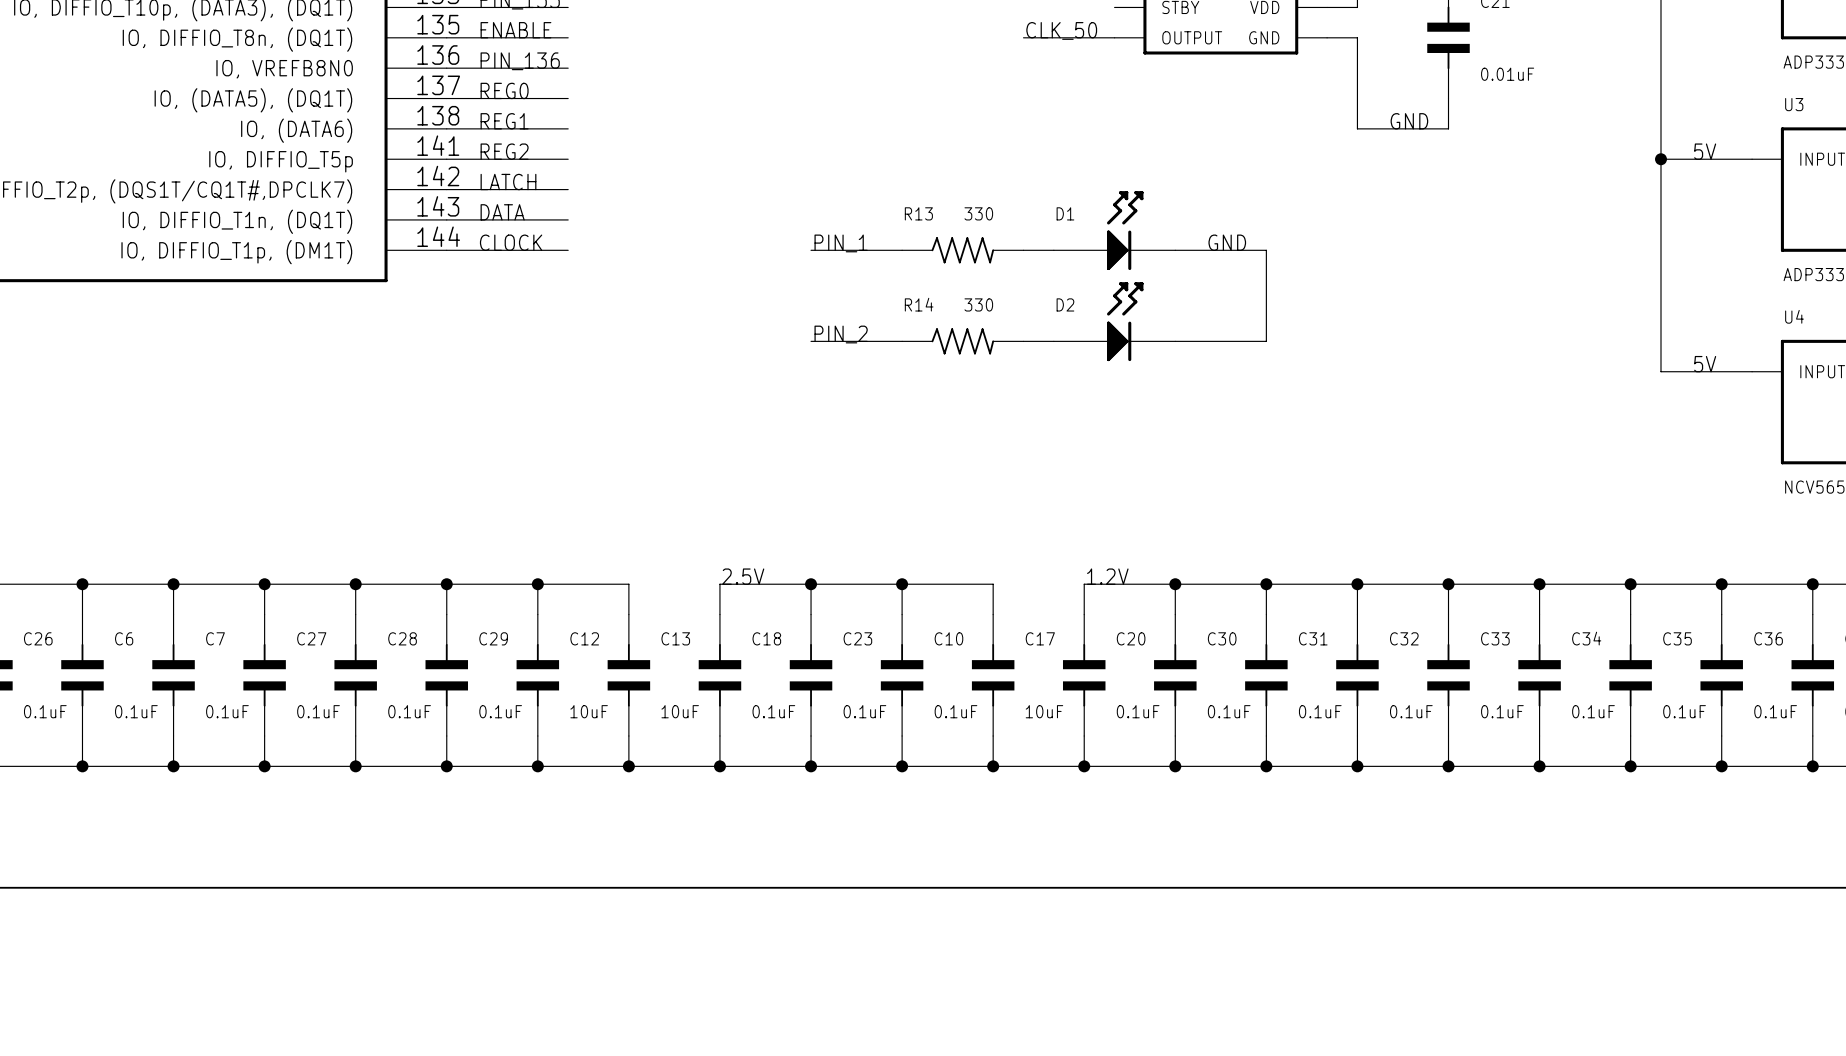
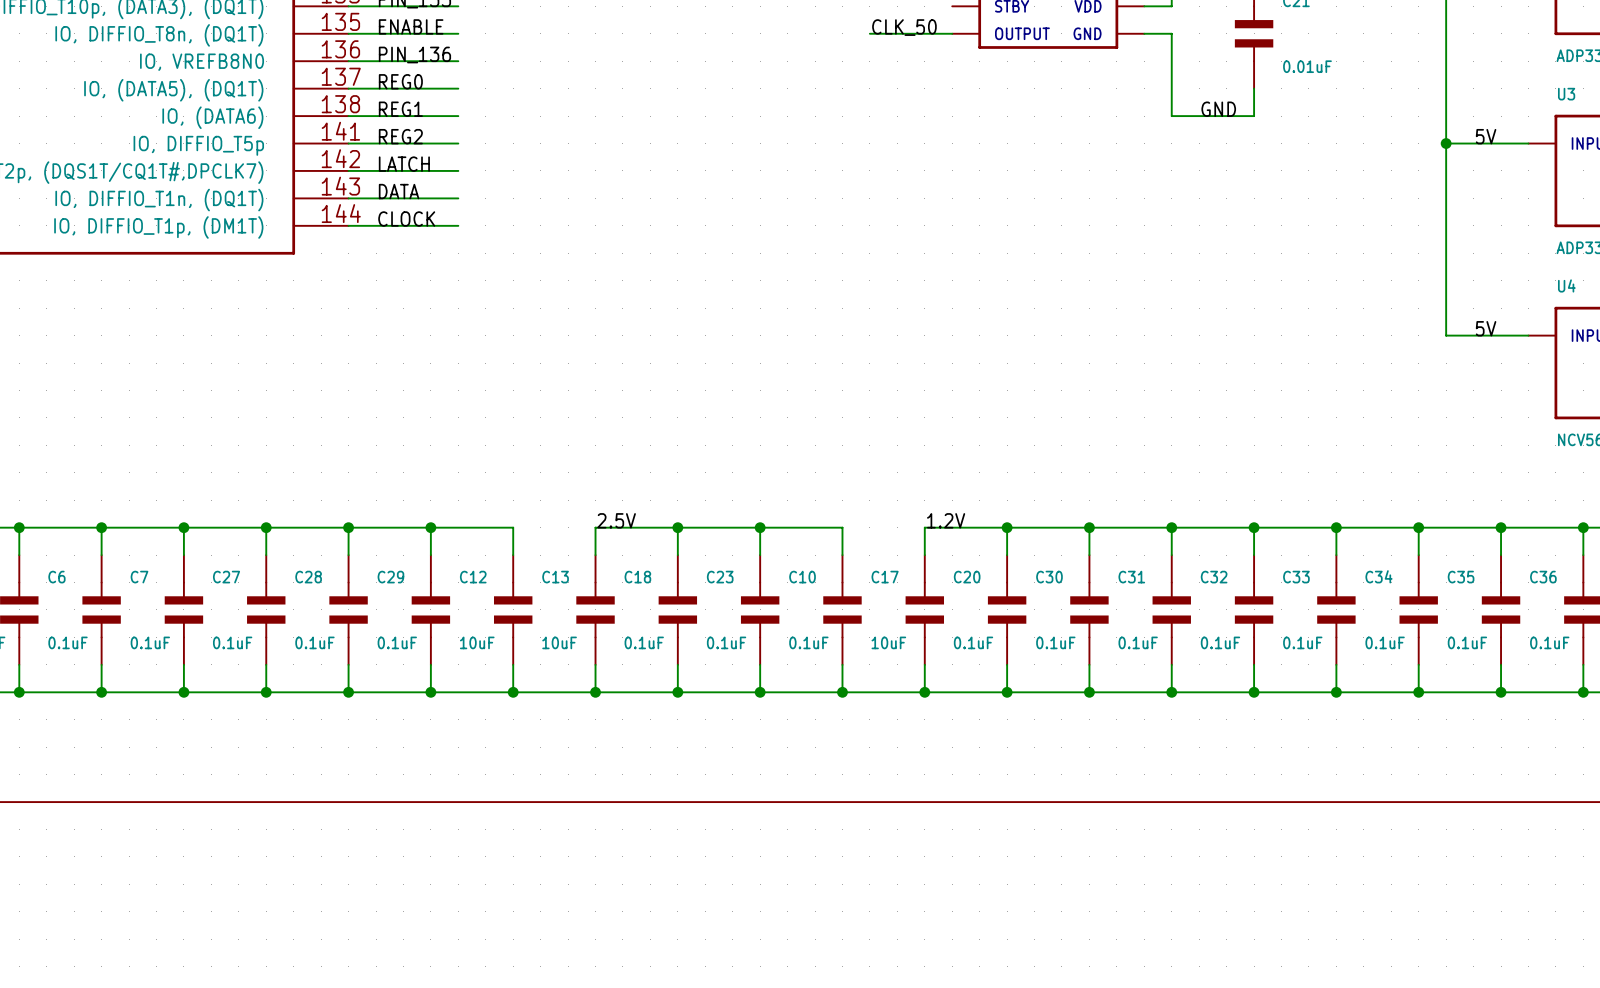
D1: (1114, 230) -> none
label: GND (1227, 242) -> none
label: PIN_1 (841, 243) -> none
wire: (811, 250) (902, 250) -> none
R13: 330 (962, 250) -> none
wire: (1023, 250) (1053, 250) -> none
wire: (1175, 250) (1266, 250) (1266, 341) (1175, 341) -> none
D2: (1114, 321) -> none
label: PIN_2 (841, 334) -> none
wire: (811, 341) (902, 341) -> none
R14: 330 (962, 341) -> none
wire: (1023, 341) (1053, 341) -> none

